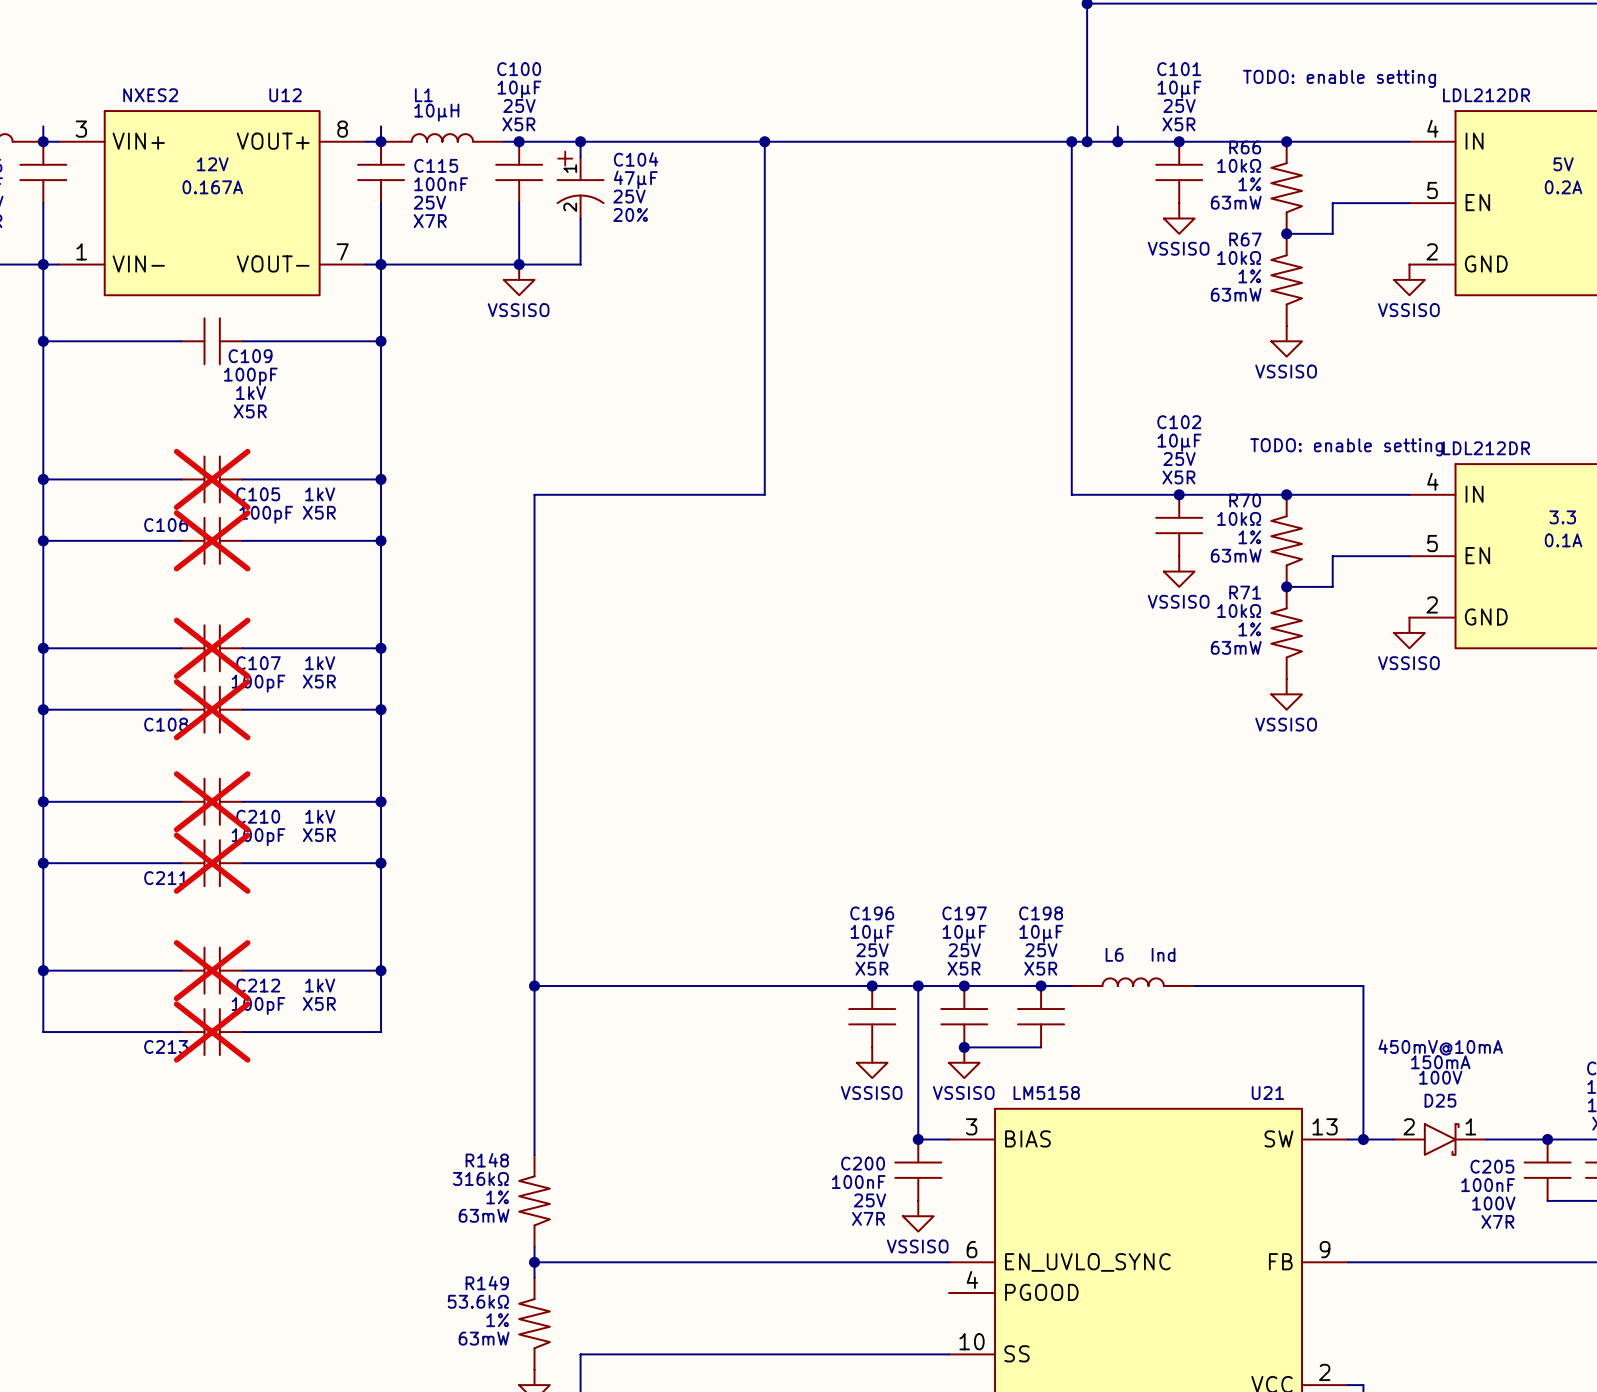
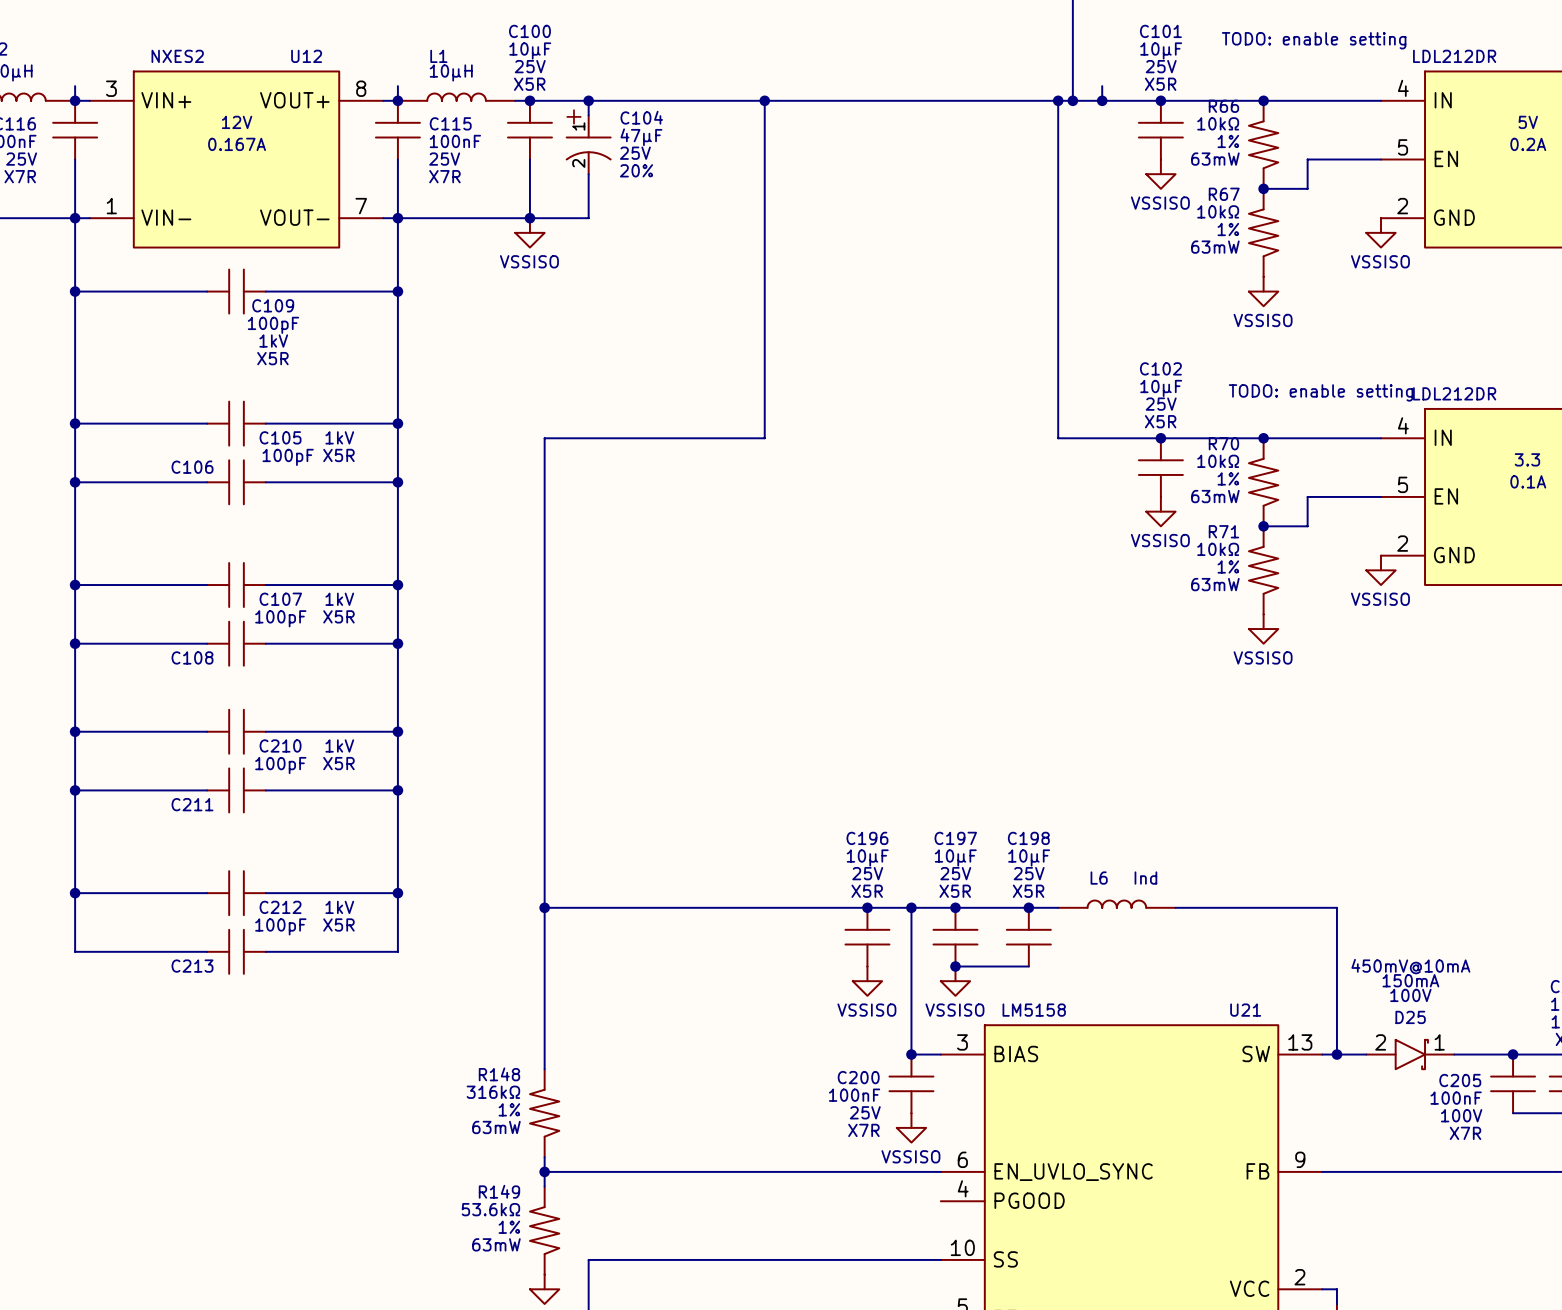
C105 do-not-place cross: (212, 479) -> none
C106 do-not-place cross: (212, 540) -> none
C107 do-not-place cross: (212, 648) -> none
C108 do-not-place cross: (212, 709) -> none
C210 do-not-place cross: (212, 801) -> none
C211 do-not-place cross: (212, 863) -> none
C212 do-not-place cross: (212, 970) -> none
C213 do-not-place cross: (212, 1032) -> none

